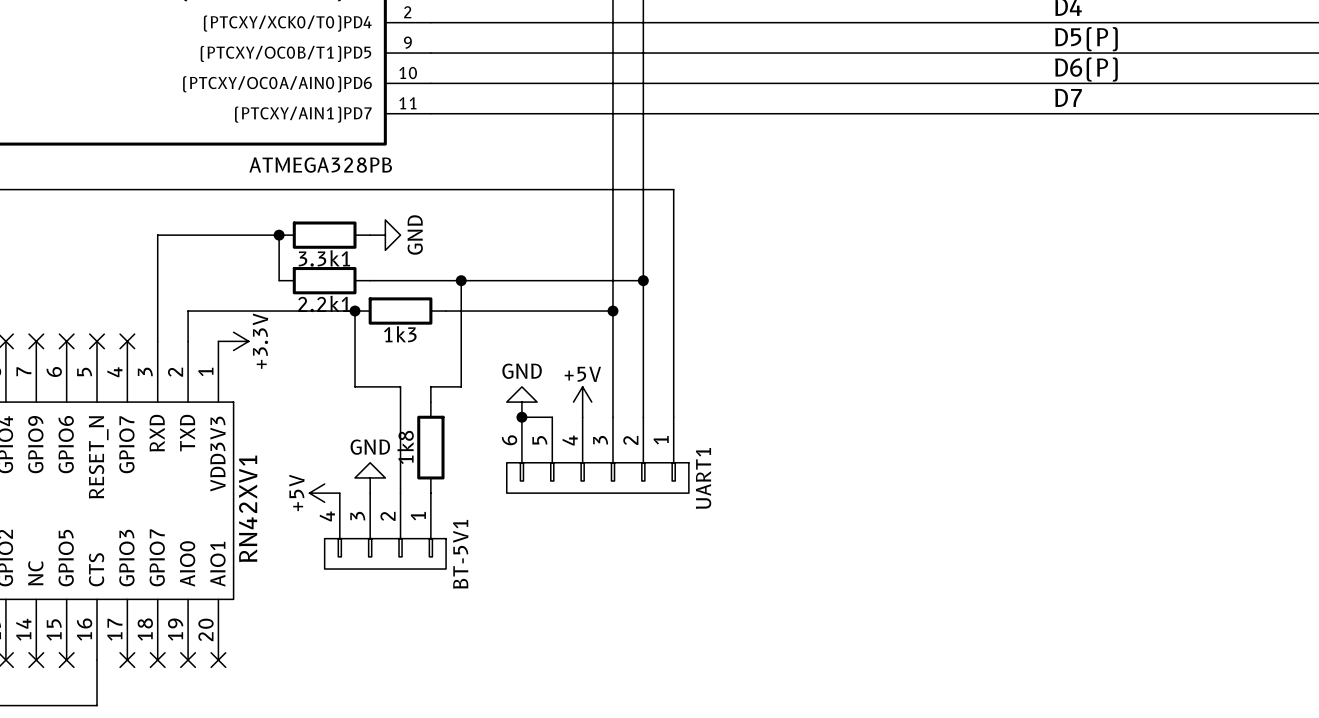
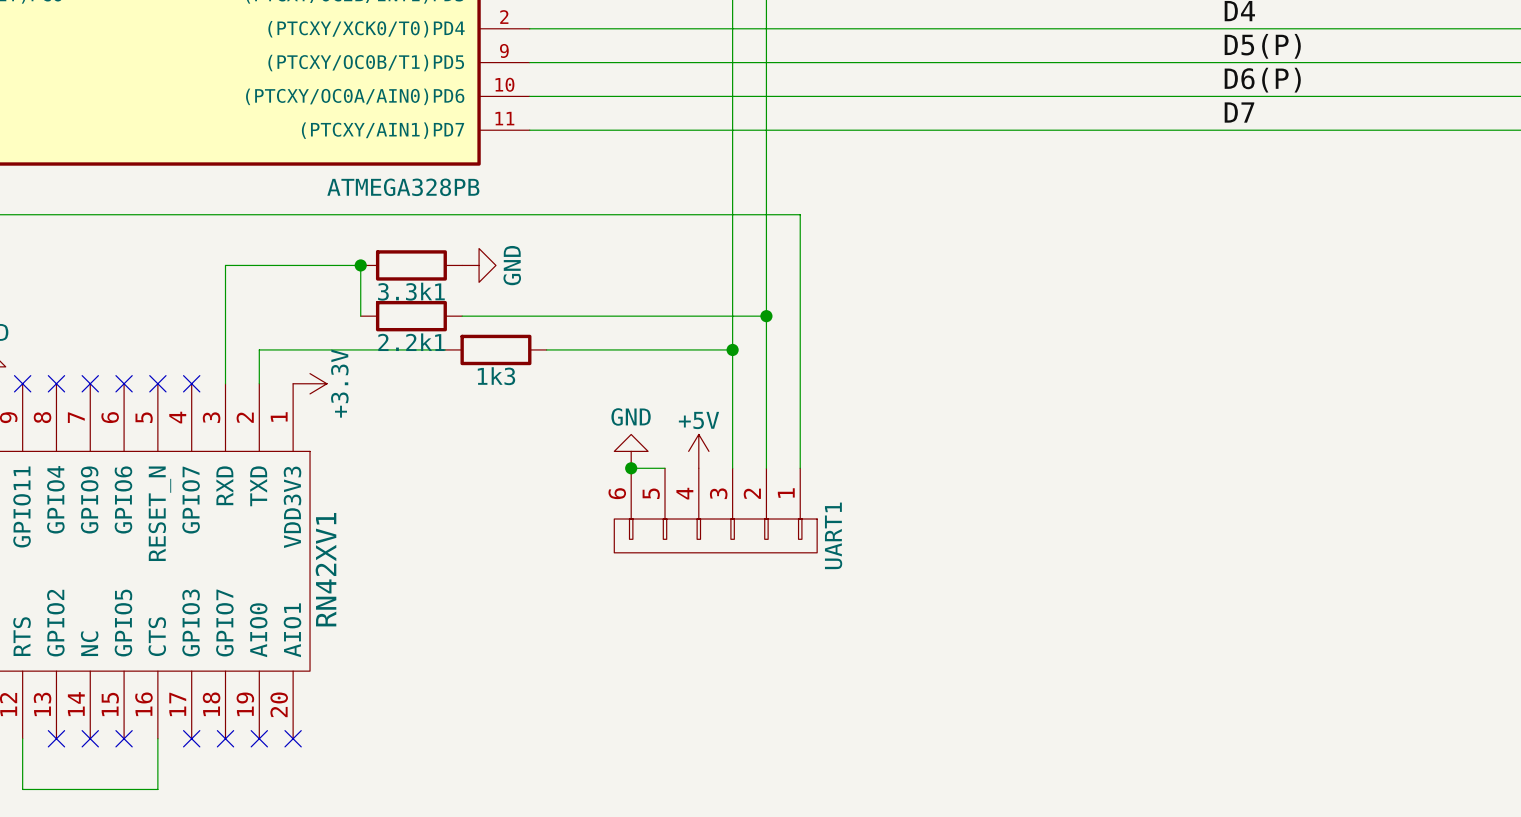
wire: (461, 280) (461, 386) (430, 386) (430, 402) -> none
junction: (461, 280) -> none
wire: (355, 311) (355, 386) (400, 386) (400, 493) -> none
junction: (355, 311) -> none
1k8: (430, 447) -> none
power symbol: GND (370, 477) -> none
power symbol: +5V (324, 493) -> none
BT-5V1: (385, 531) -> none

